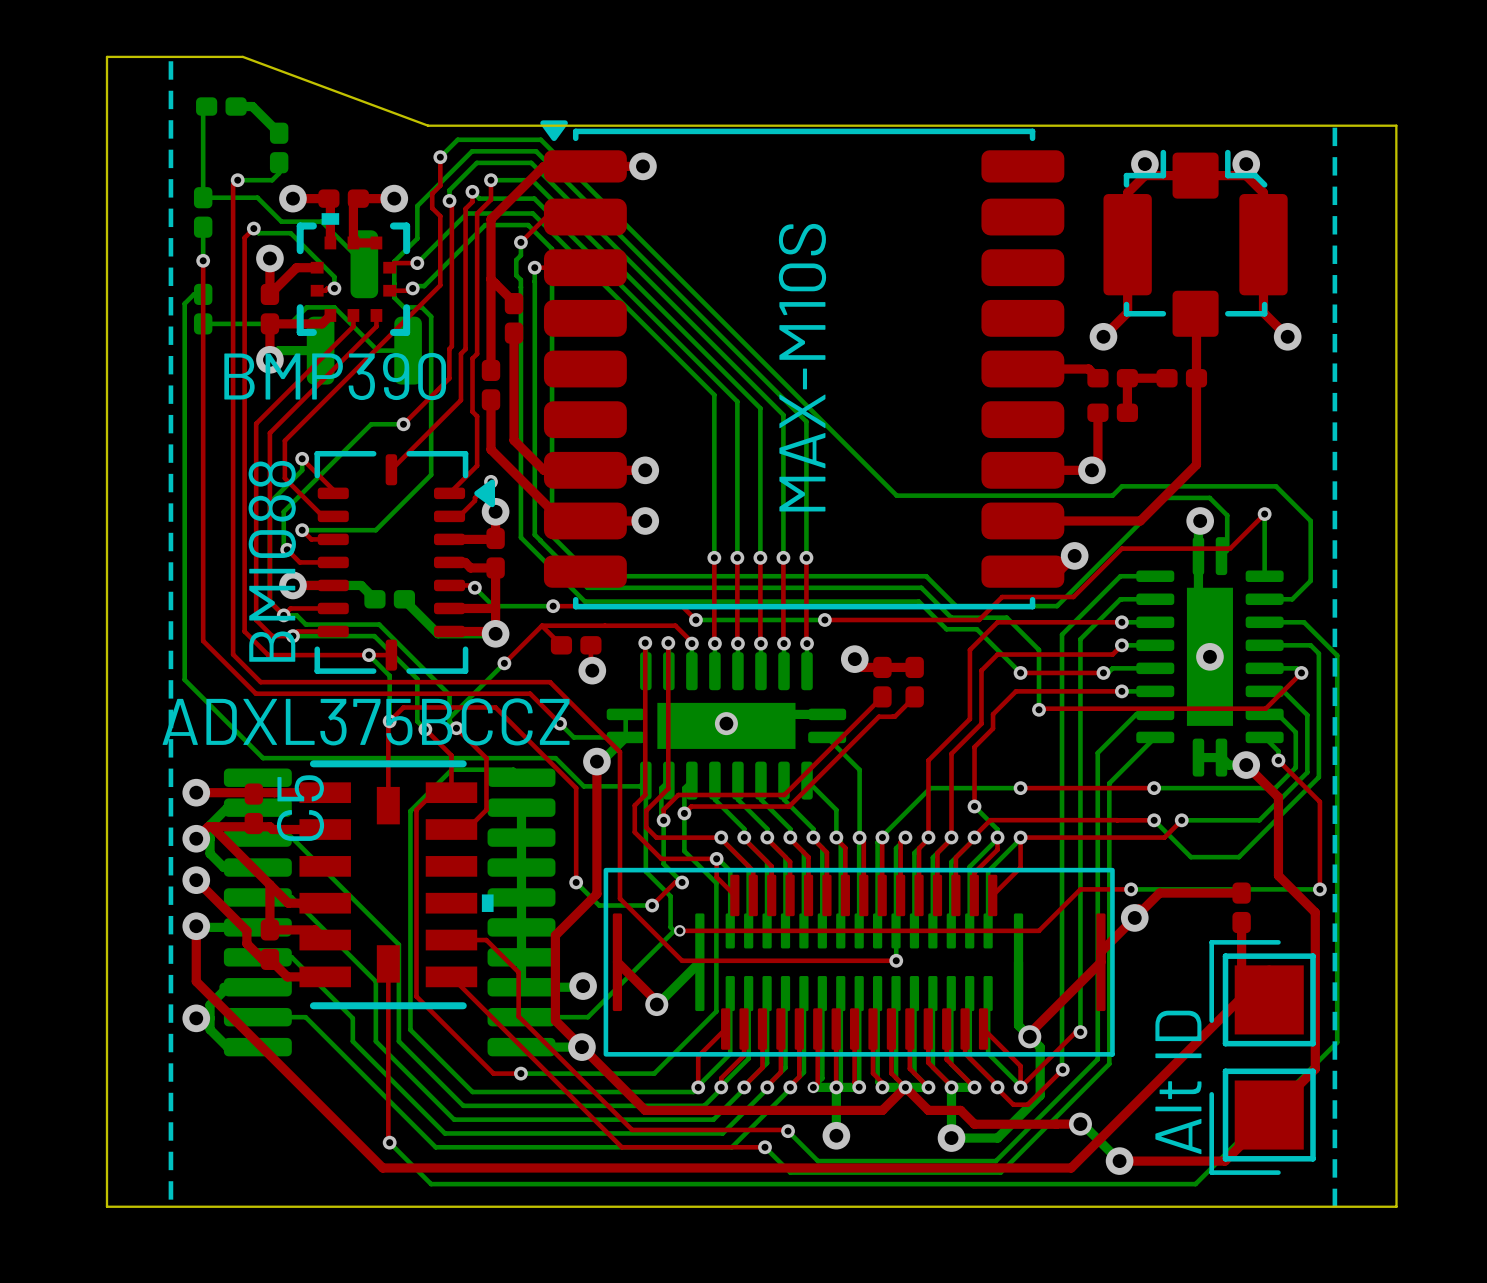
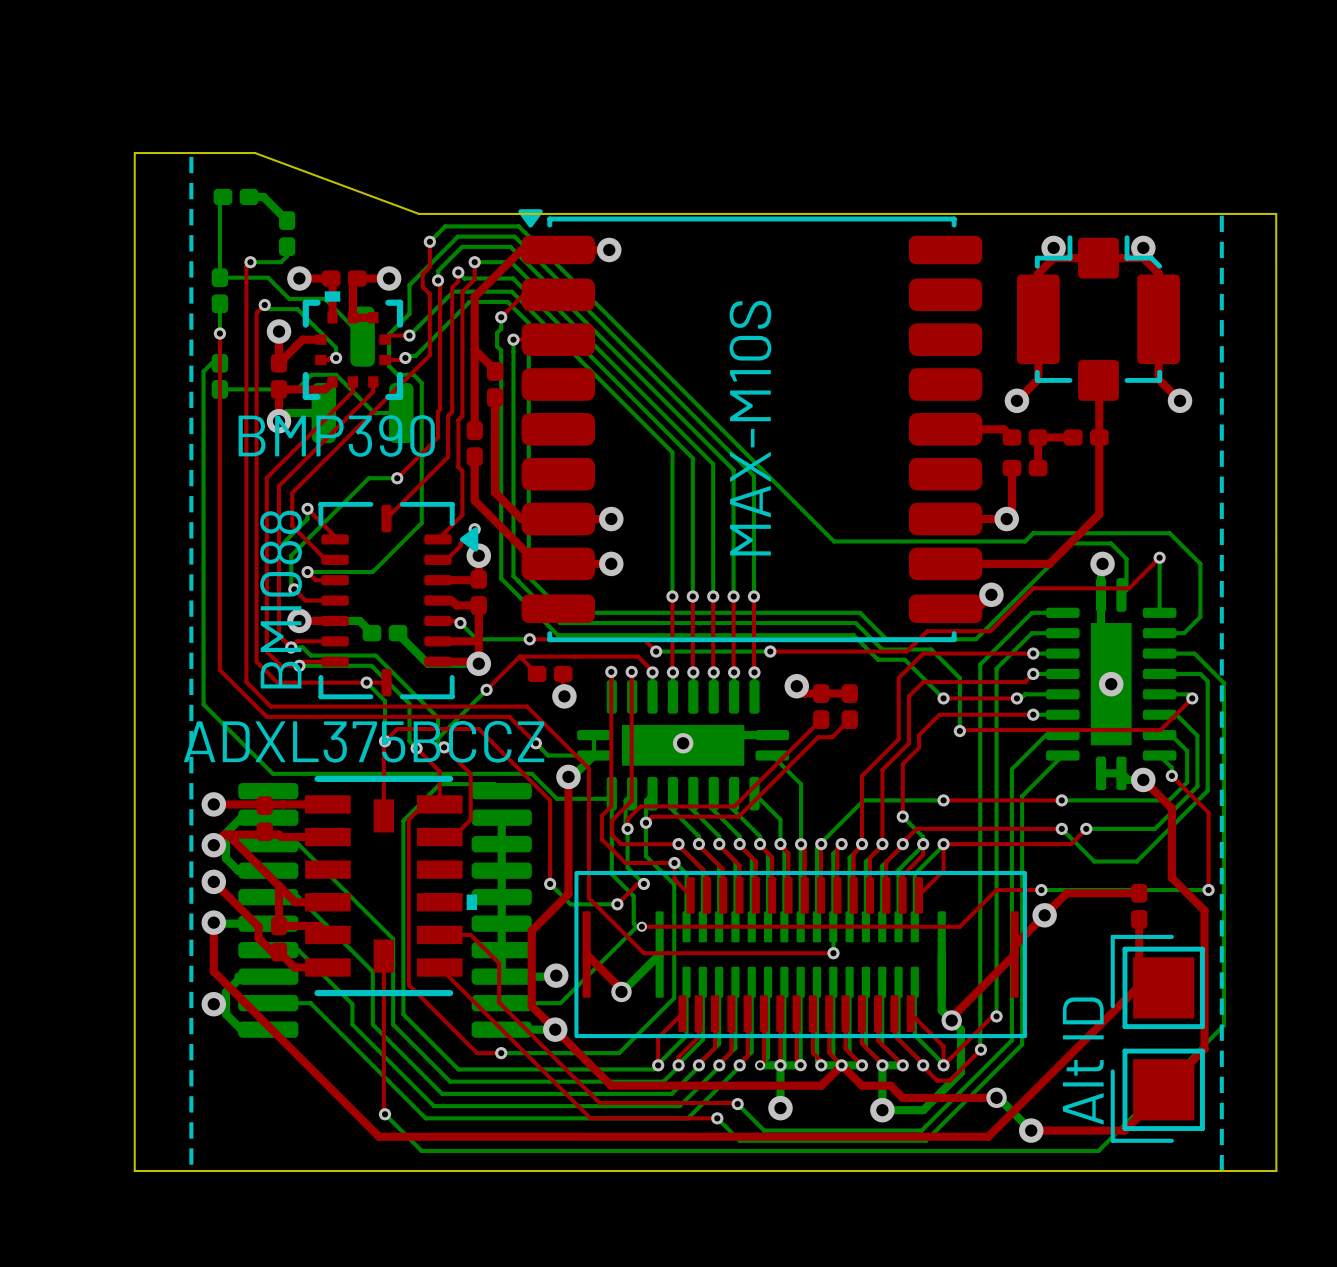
C5 name: C5 (300, 808) -> none

